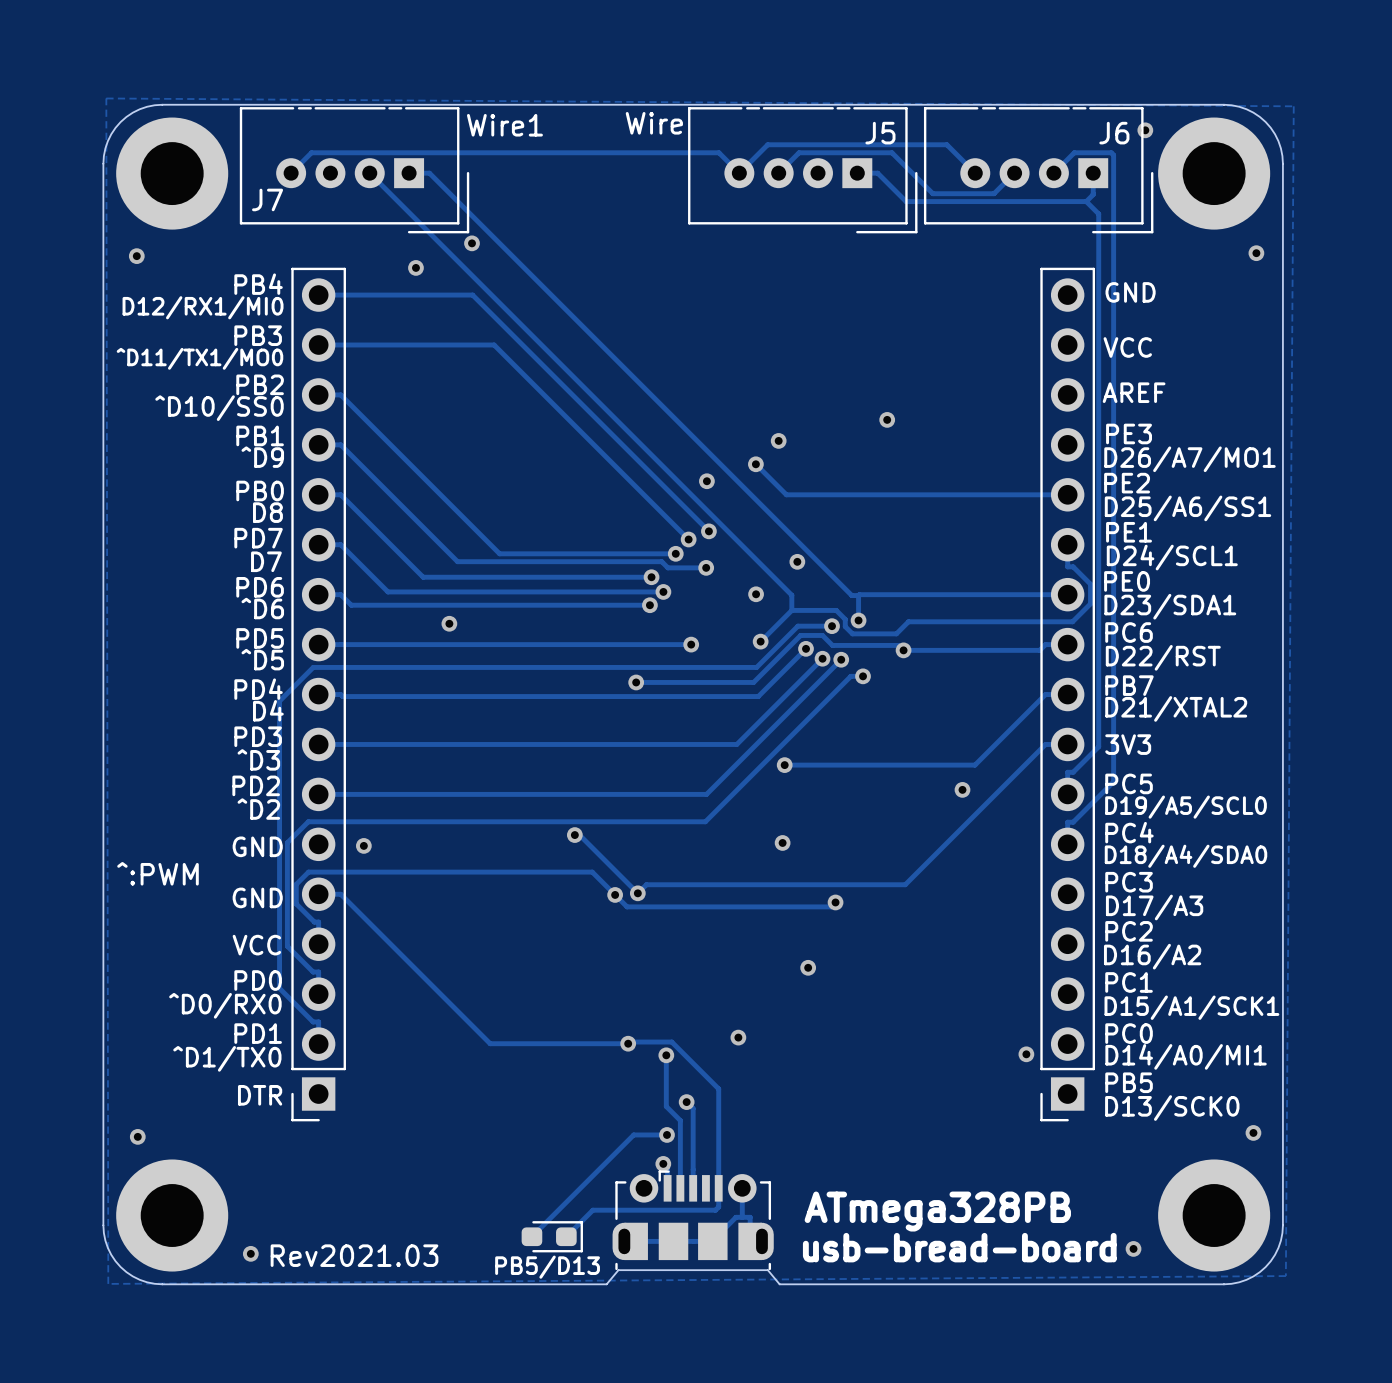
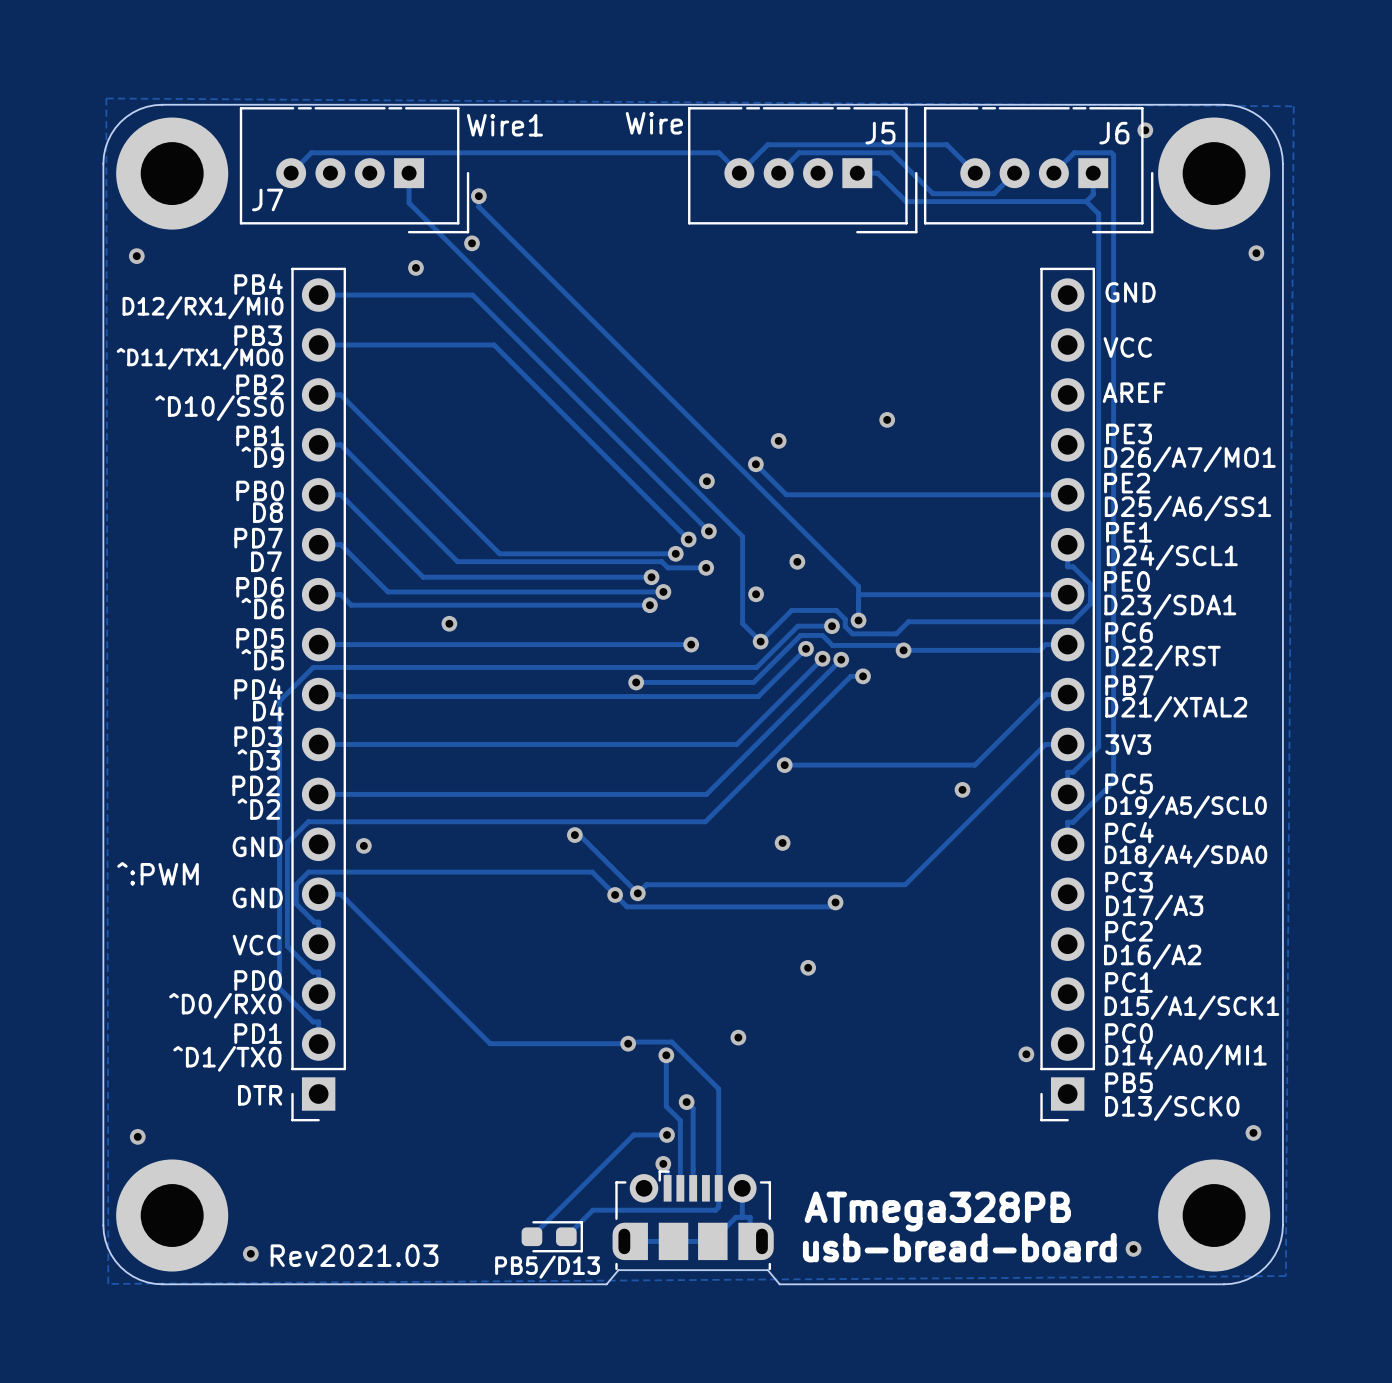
track: (369, 173) (791, 595) (791, 610) -> none
track: (409, 173) (429, 173) (851, 595) (858, 595) -> (478, 196) (478, 206) (858, 586) (858, 595)
track: none -> (409, 173) (409, 203) (742, 536) (742, 623) (760, 641)
via: none -> (478, 196)

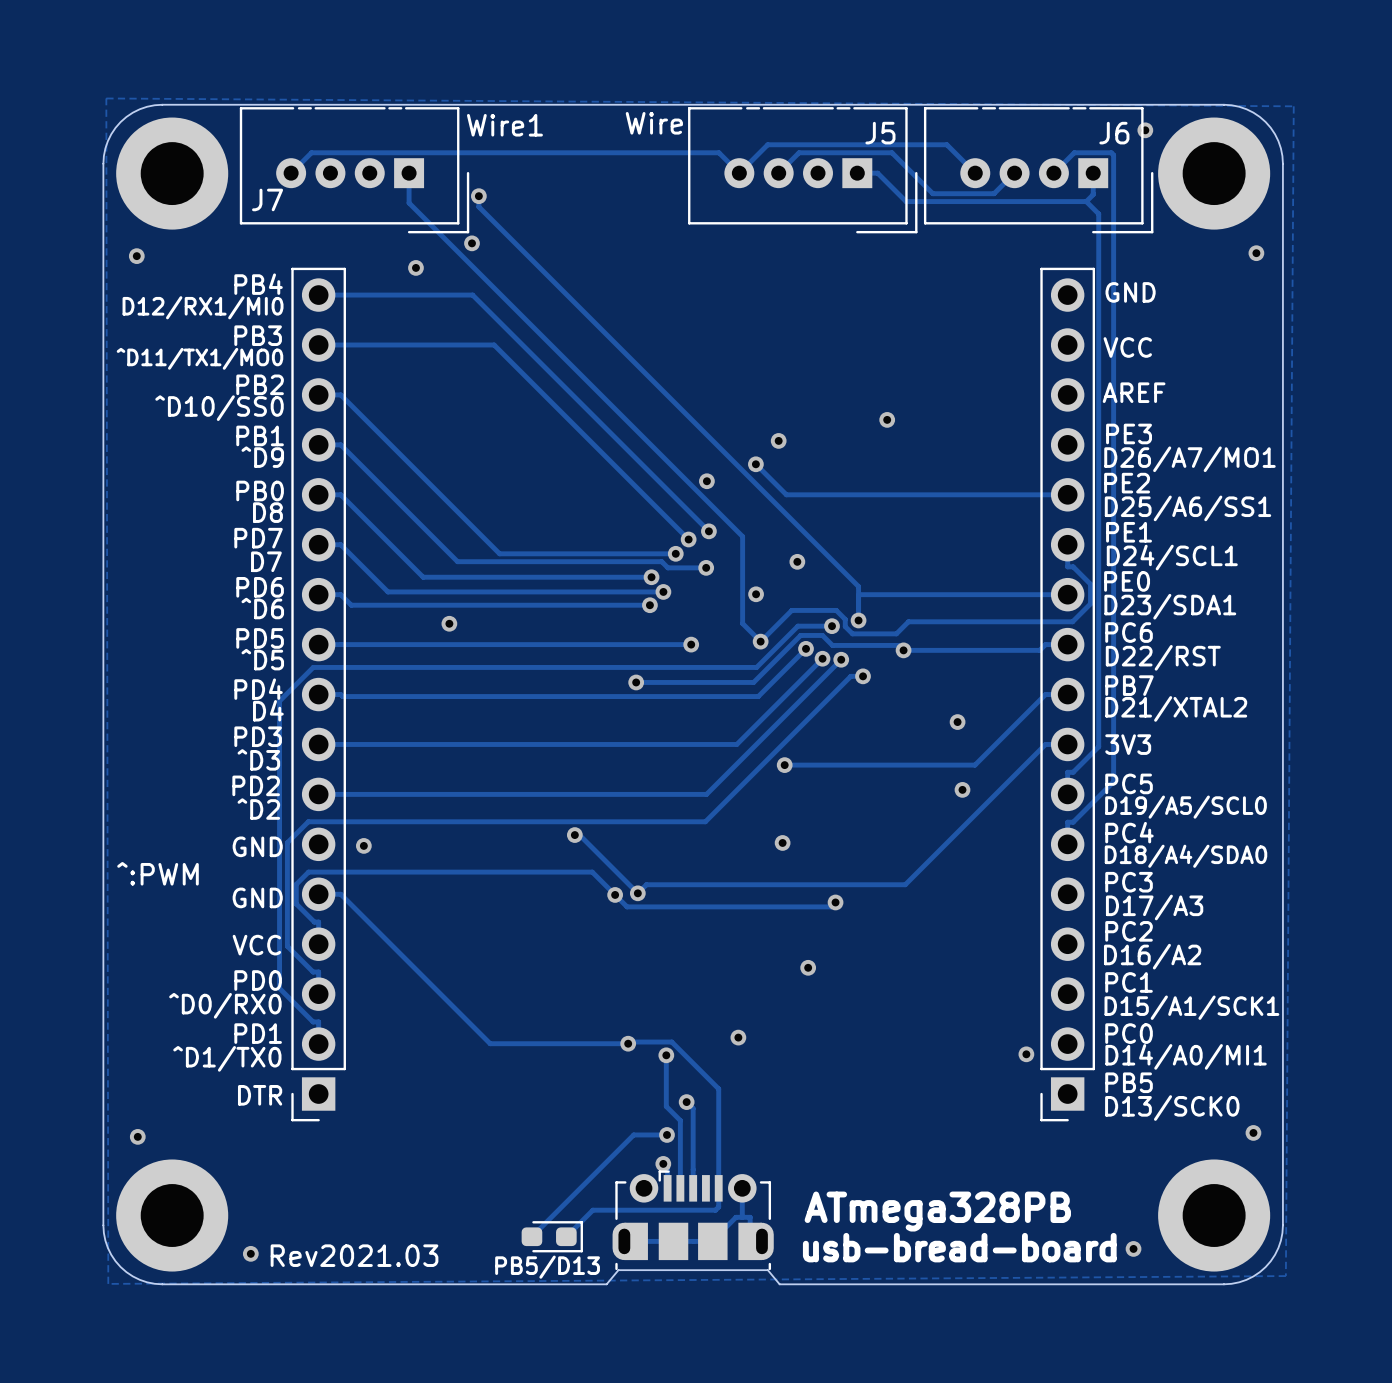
via: none -> (957, 722)

